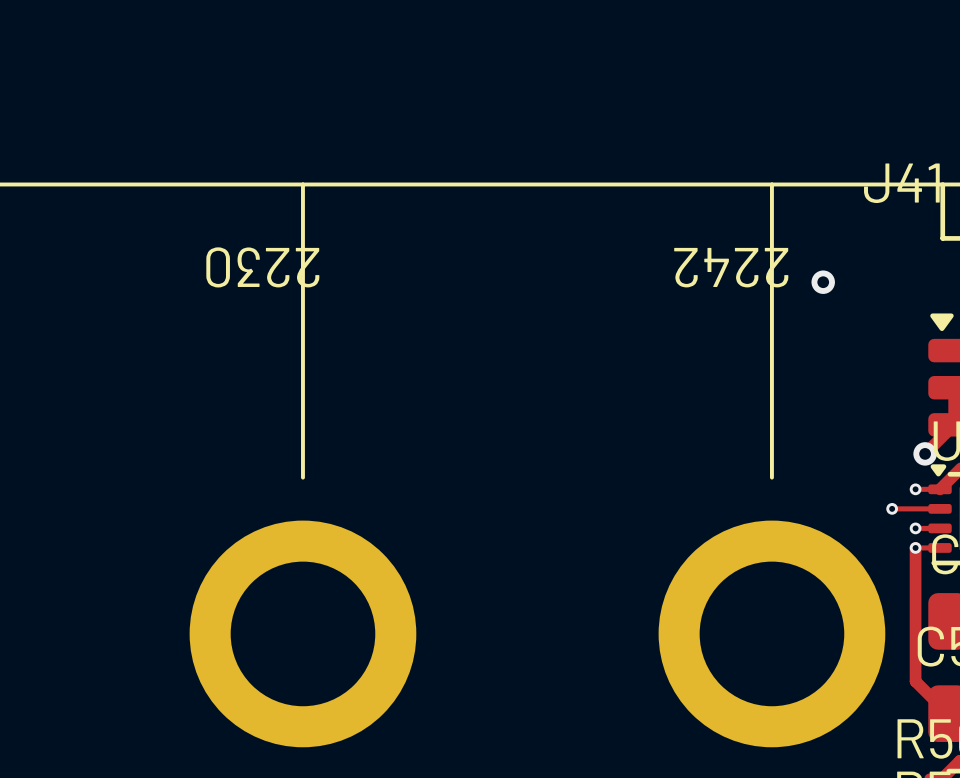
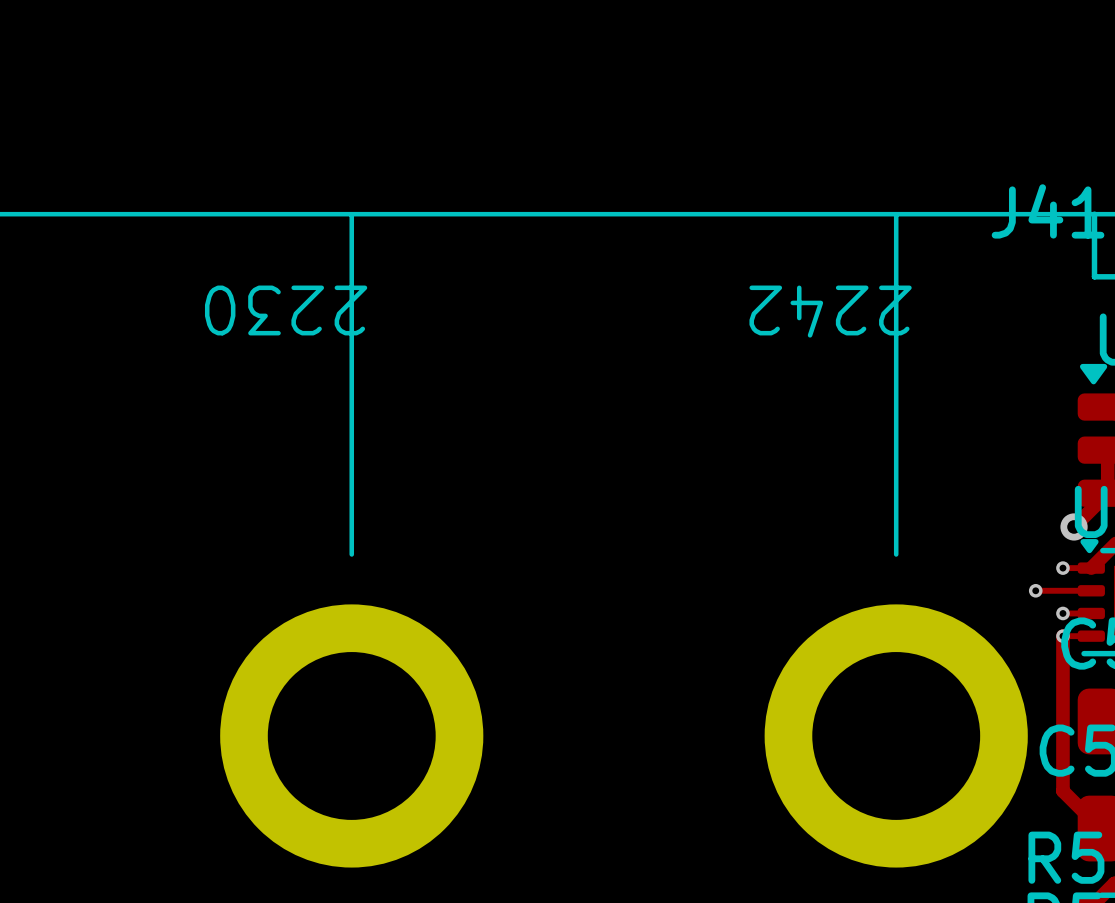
via: (823, 282) -> none

